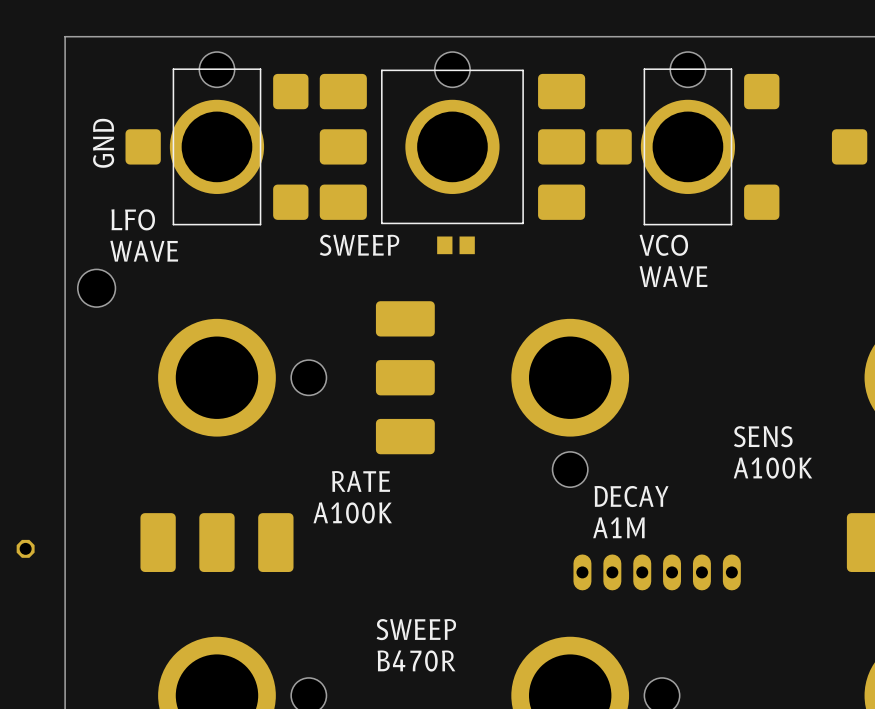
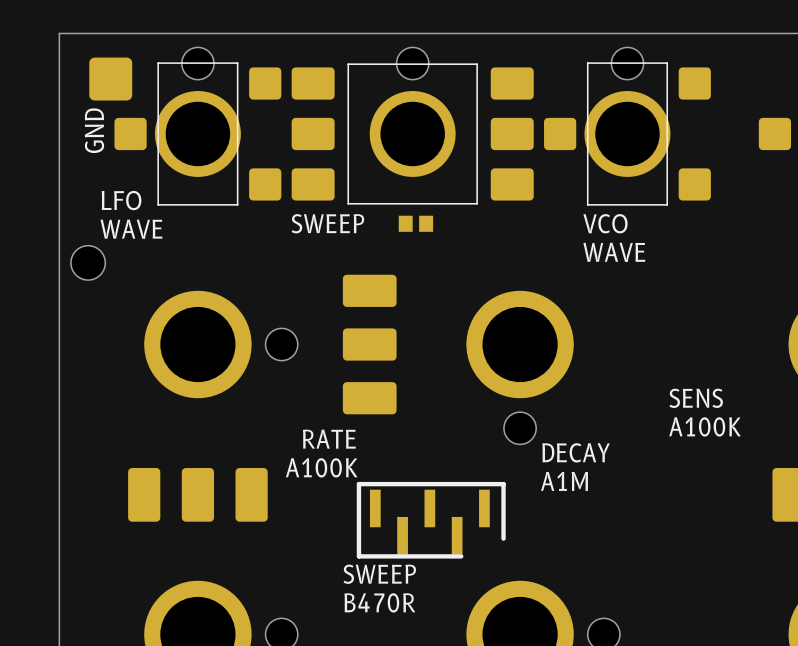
part: none -> (110, 79)
part: (25, 548) -> none
part: none -> (429, 522)
part: (612, 572) -> none
part: (701, 572) -> none
line: none -> (503, 538) (503, 484) (358, 484) (358, 556) (461, 556)

